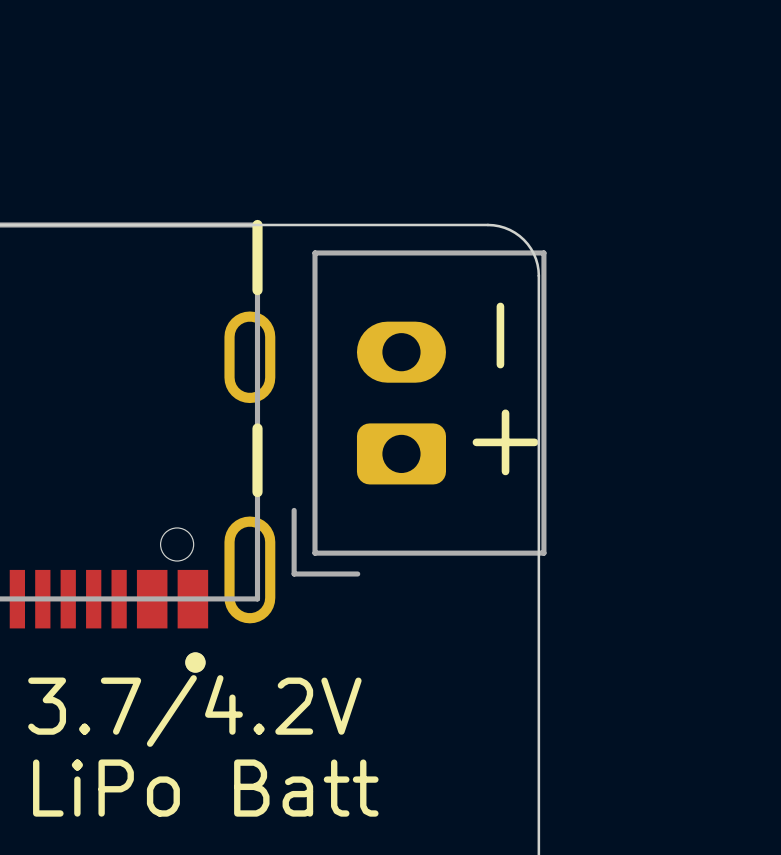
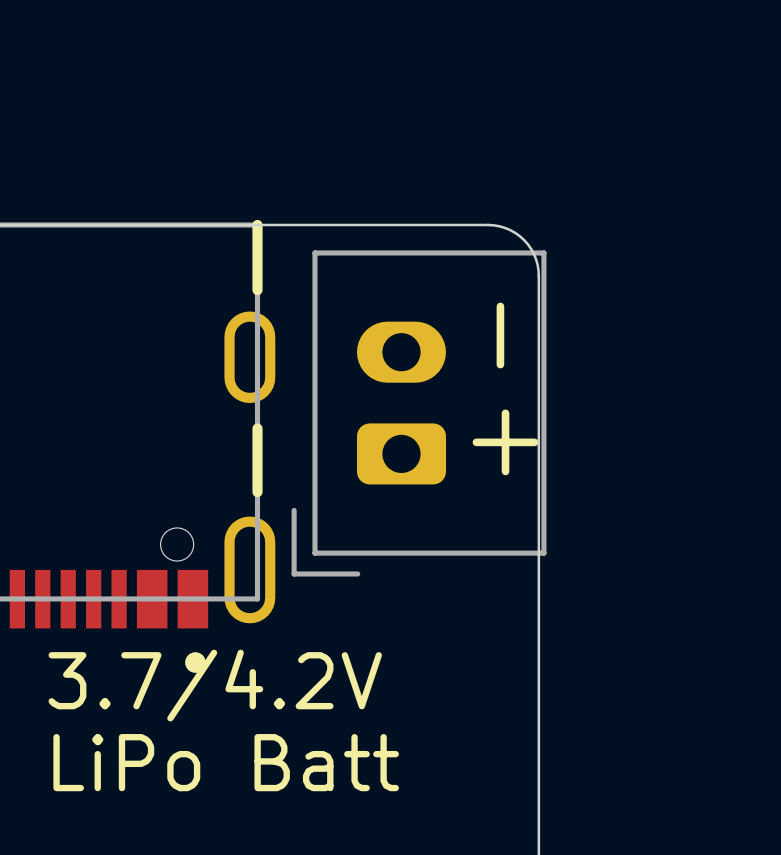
text position: 3.7/4.2V (194, 710) -> 3.7/4.2V (215, 685)
text position: LiPo Batt (205, 788) -> LiPo Batt (226, 762)

